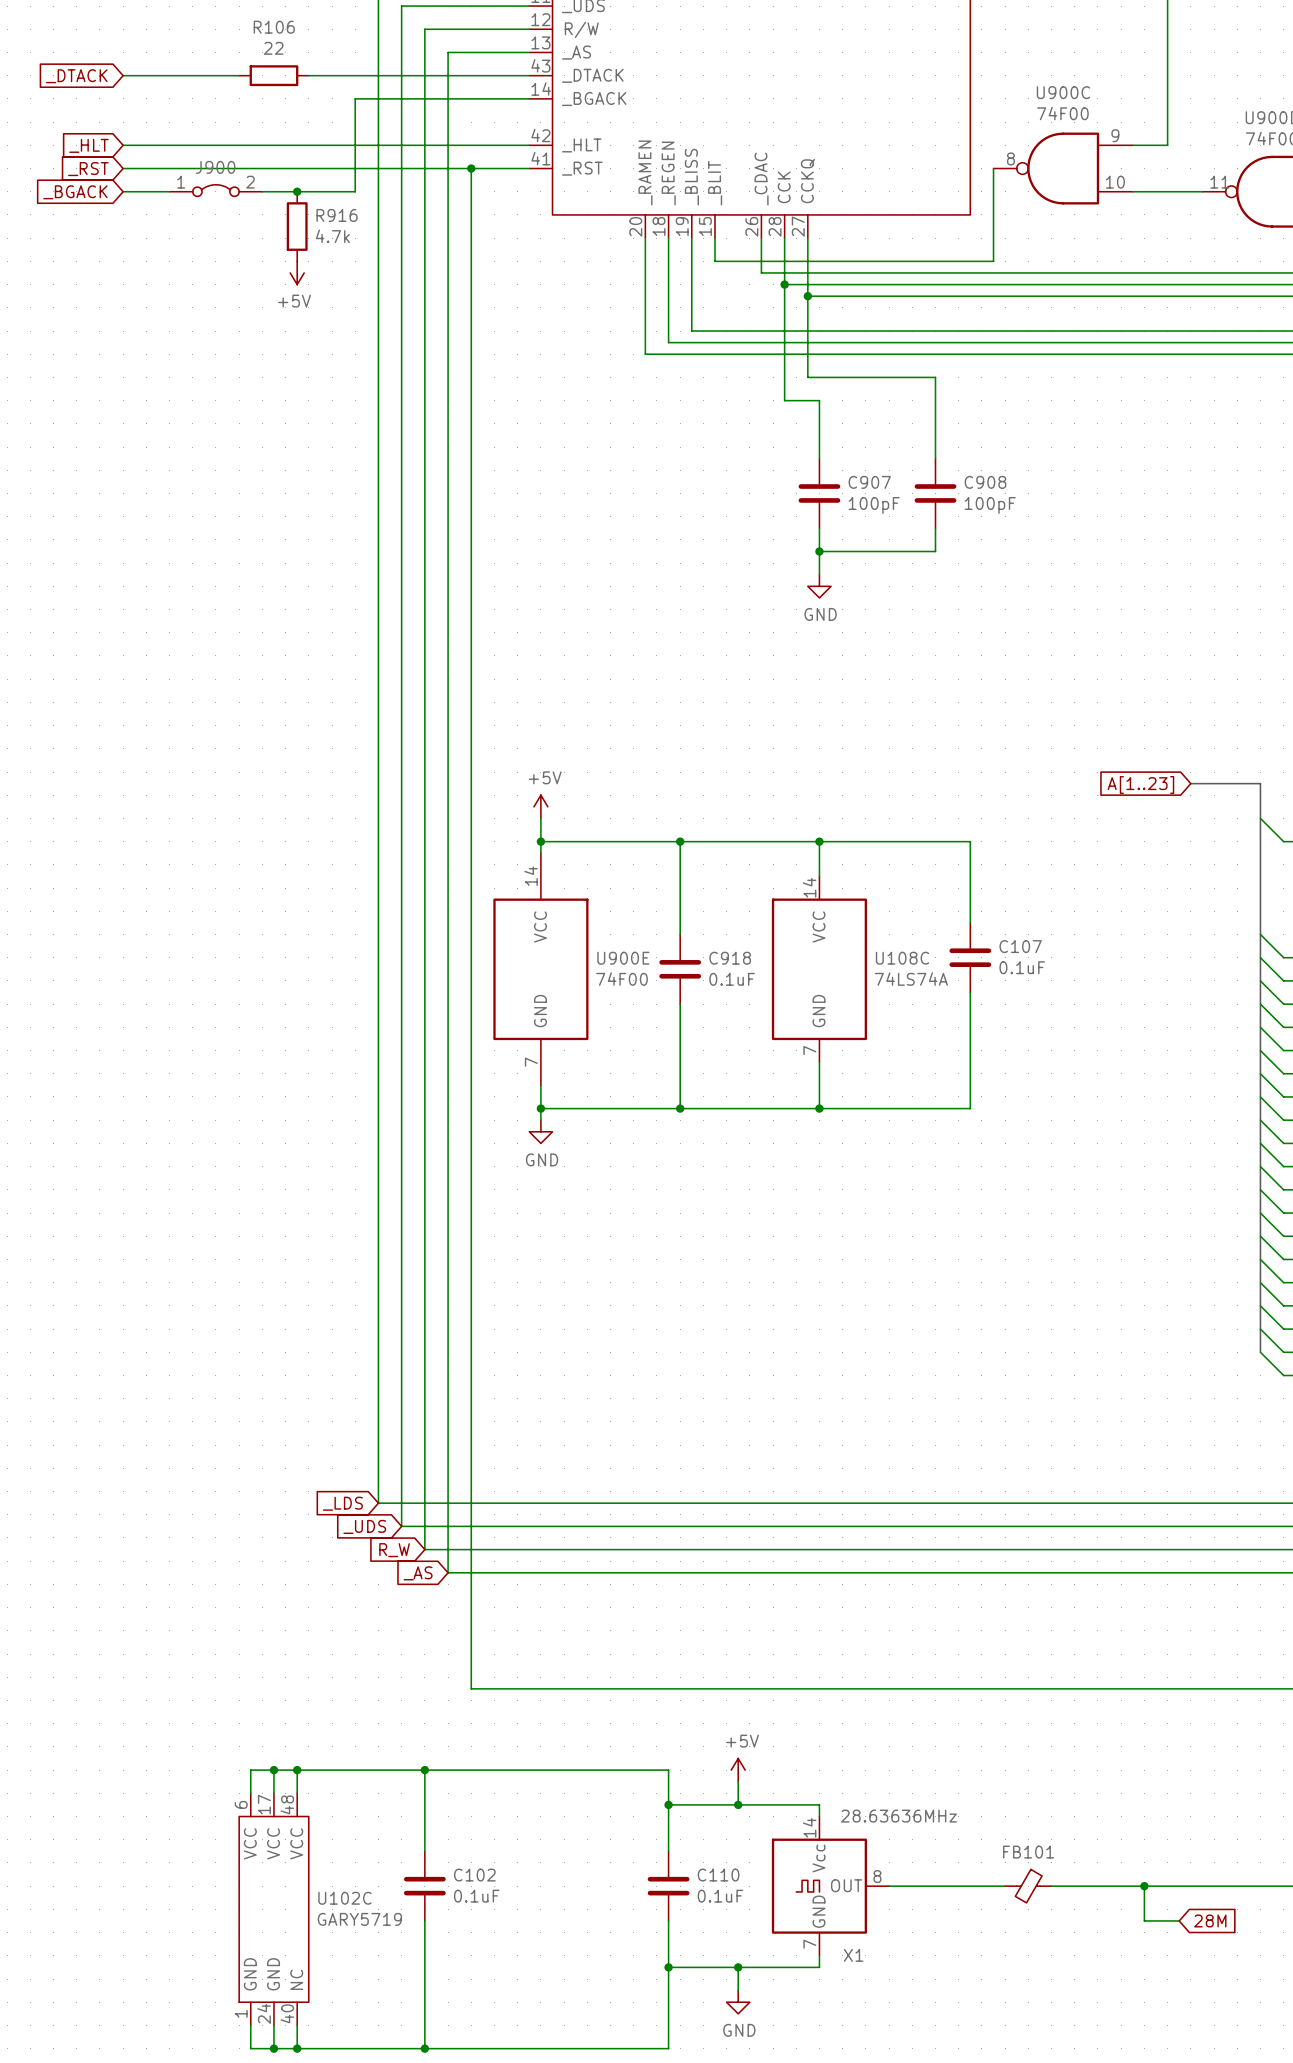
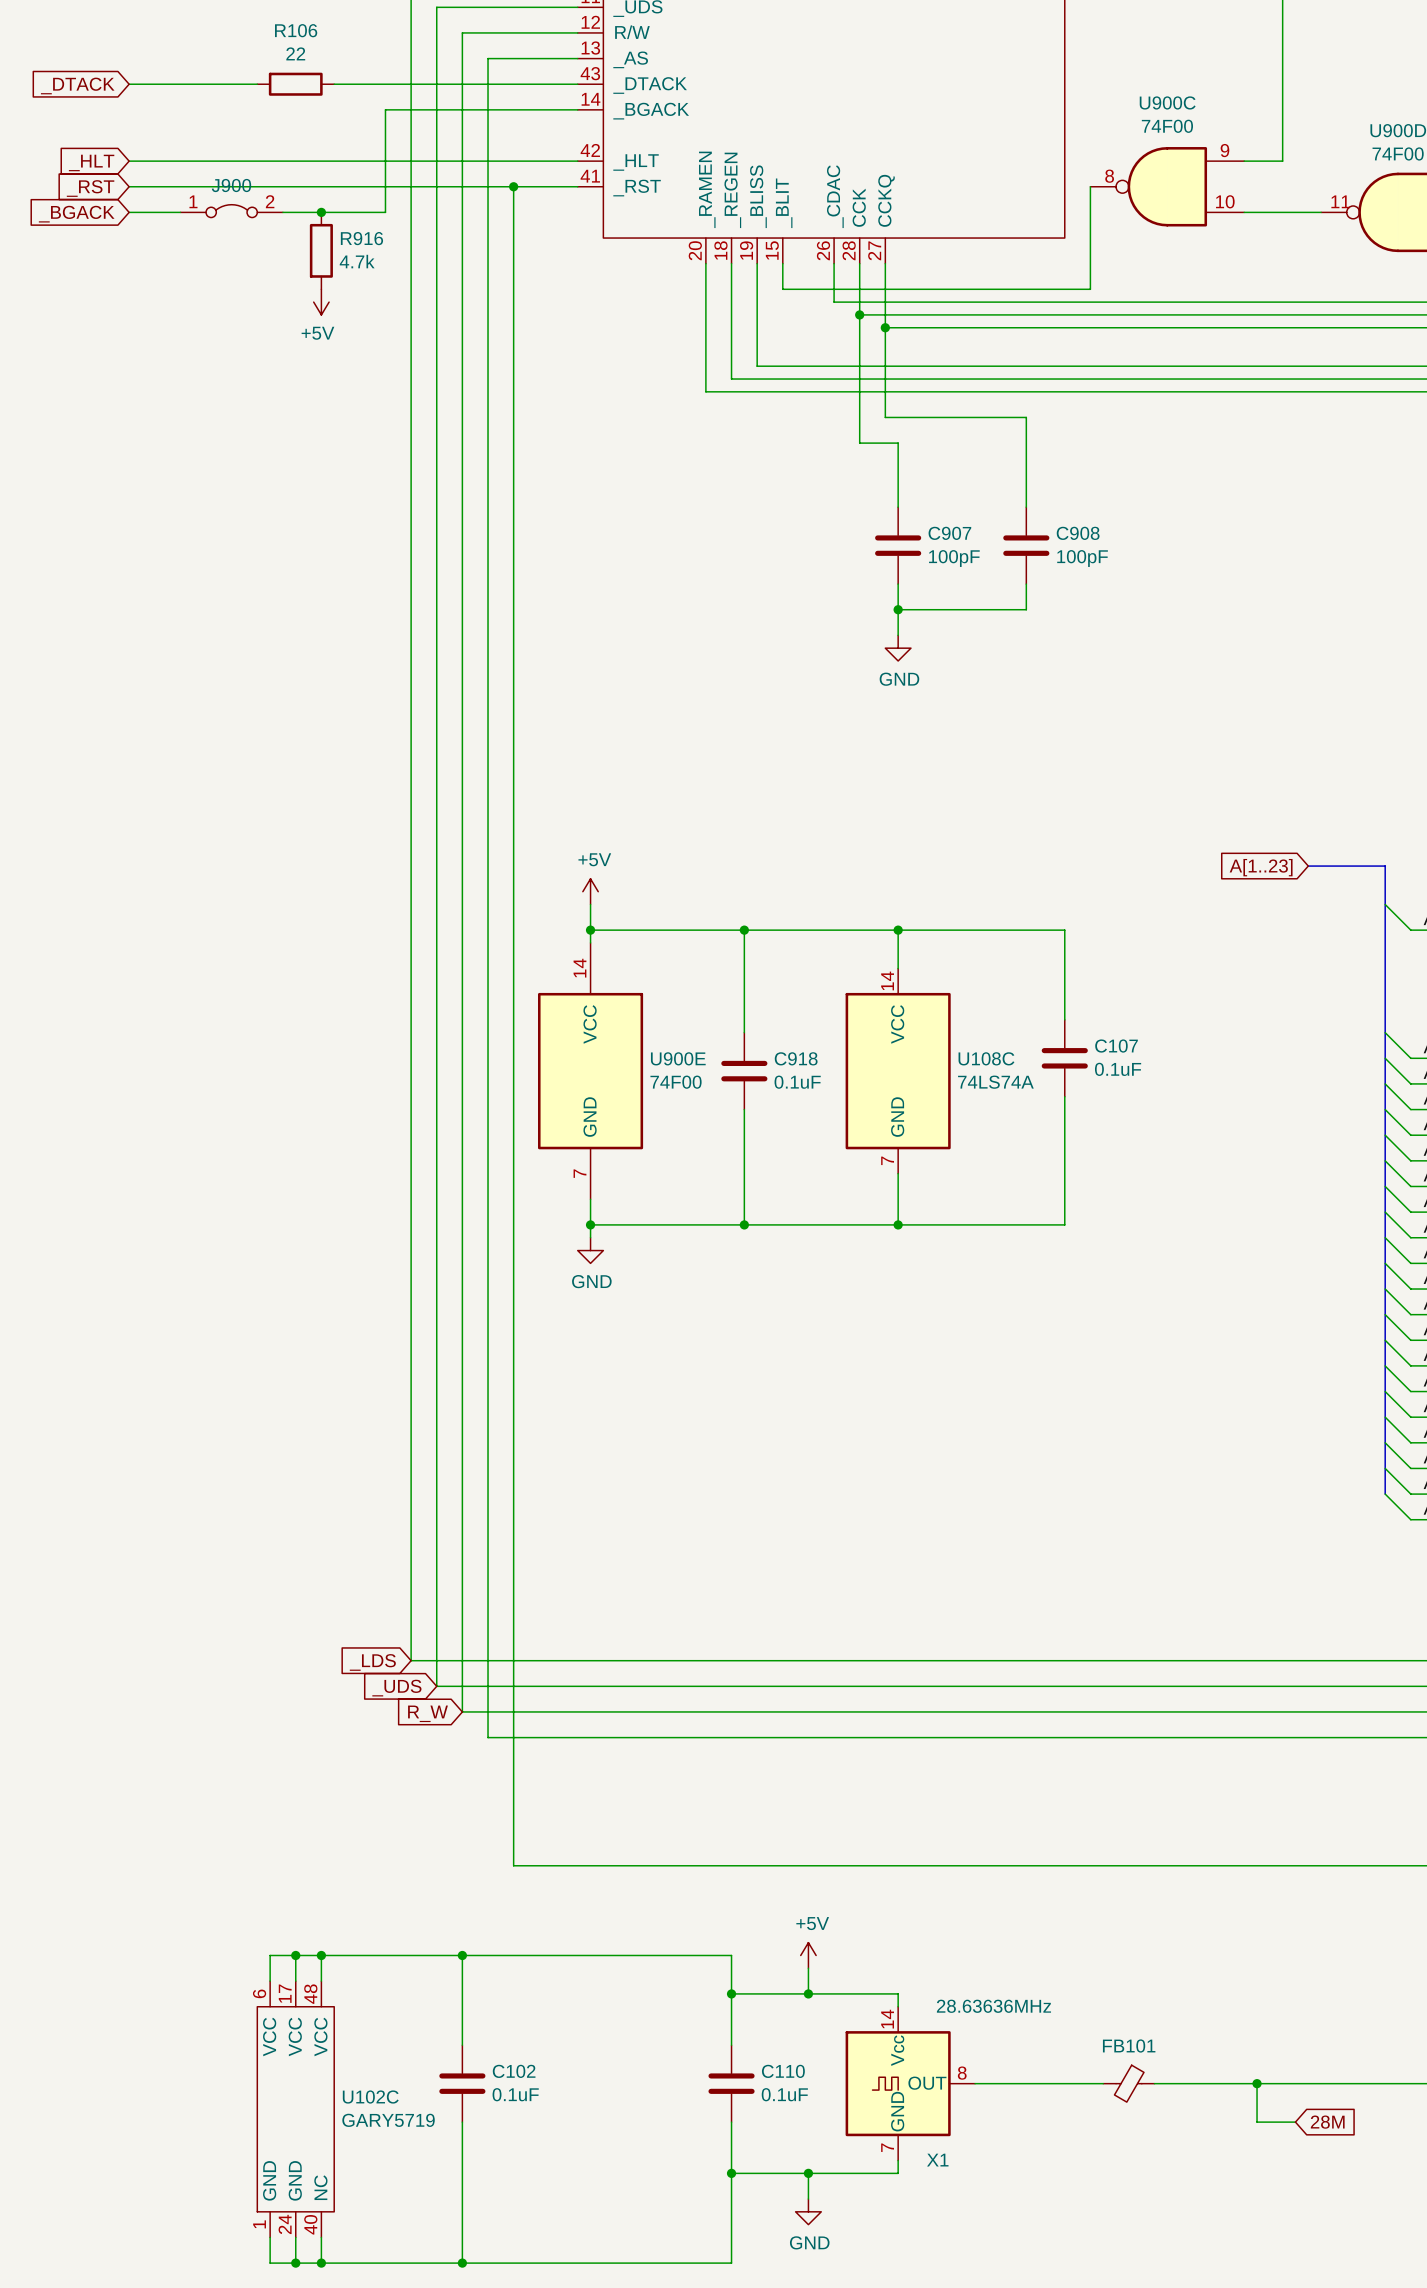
global label: _AS (418, 1573) -> none

